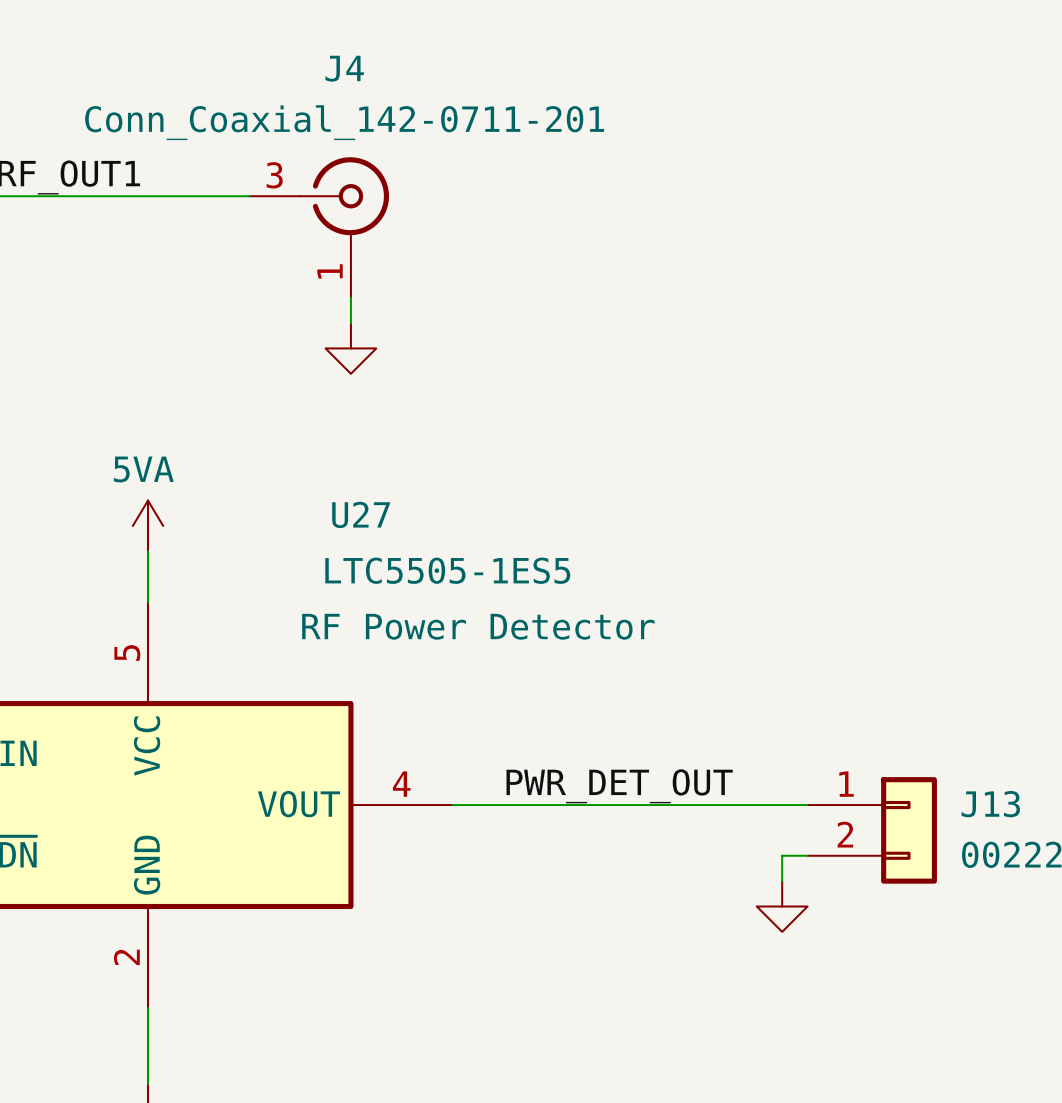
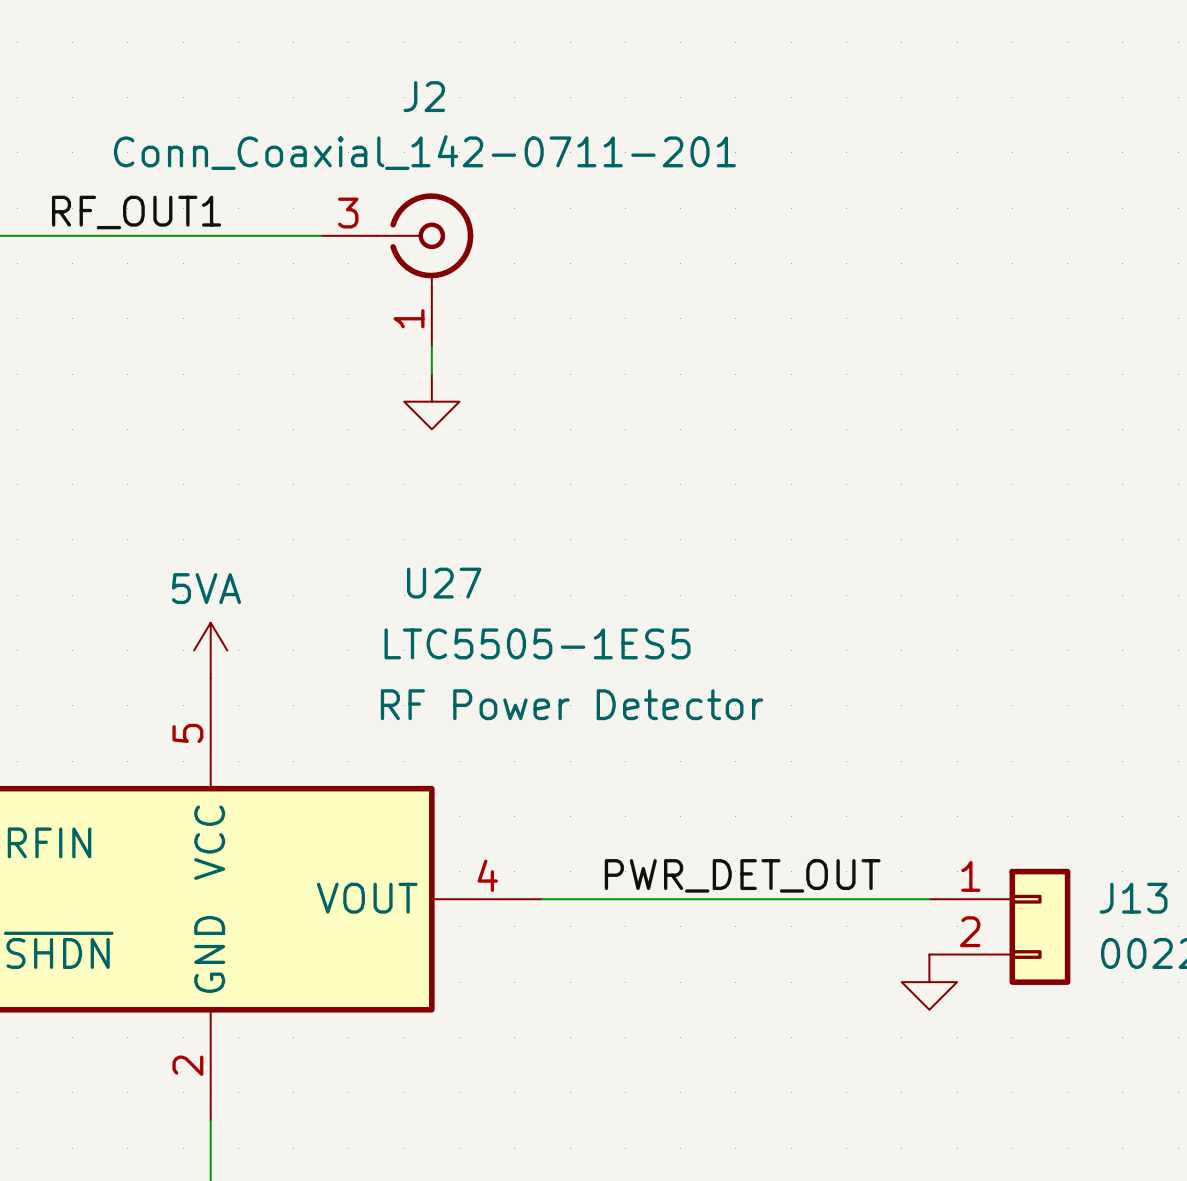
J4 name: J4 (344, 68) -> J2 (424, 96)
power symbol position: 5VA (148, 525) -> 5VA (210, 650)
wire: (807, 855) (782, 855) (782, 881) -> none
power symbol position: (782, 906) -> (929, 982)

